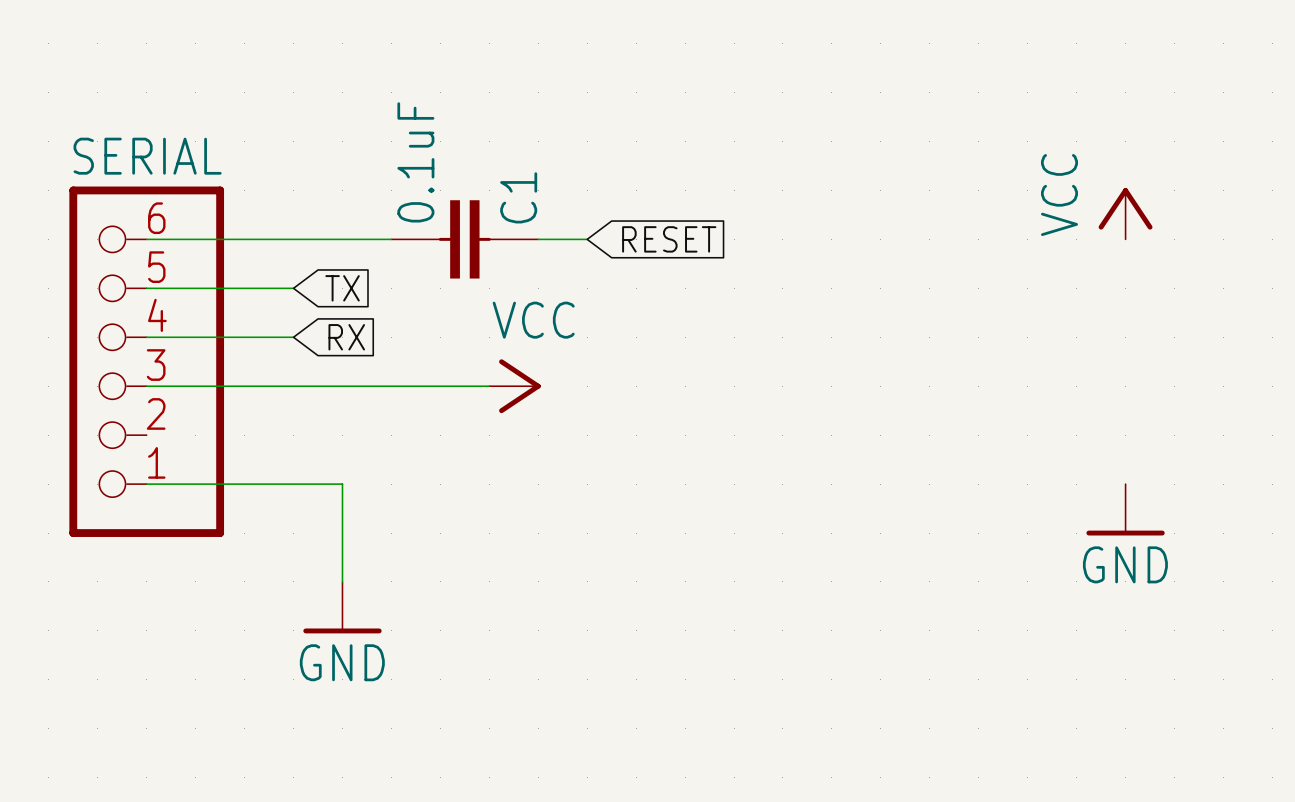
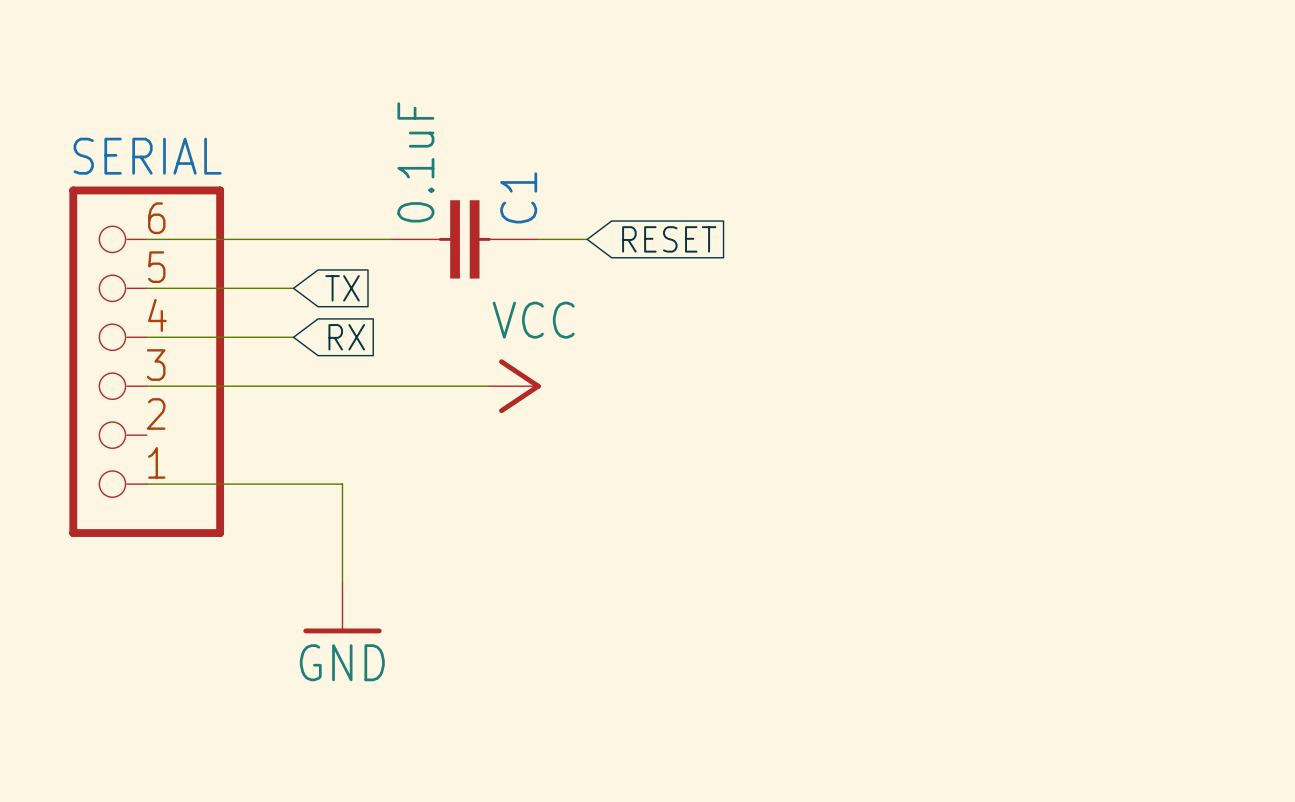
power symbol: VCC (1125, 213) -> none
power symbol: GND (1125, 509) -> none

